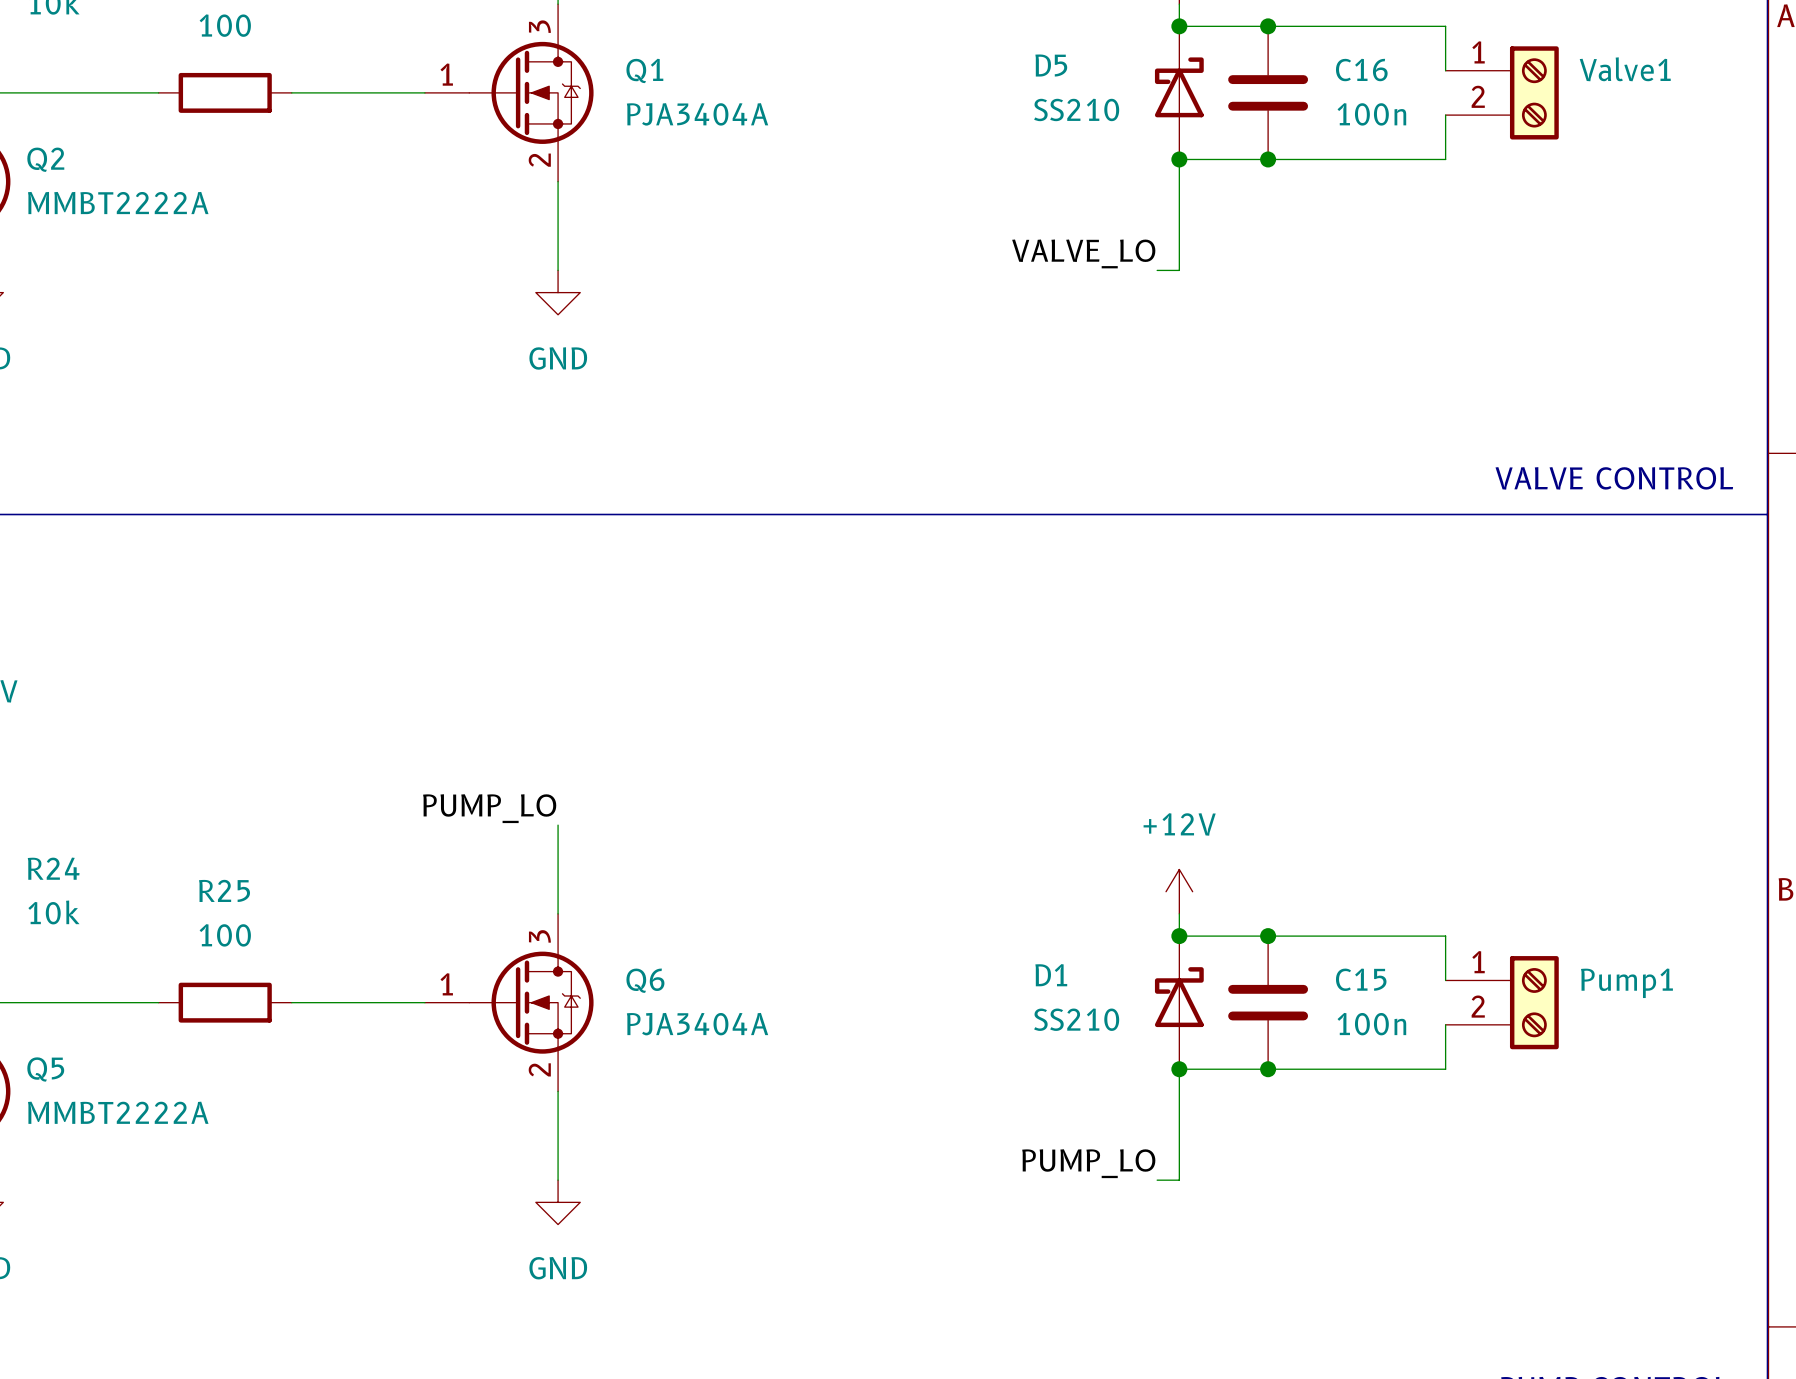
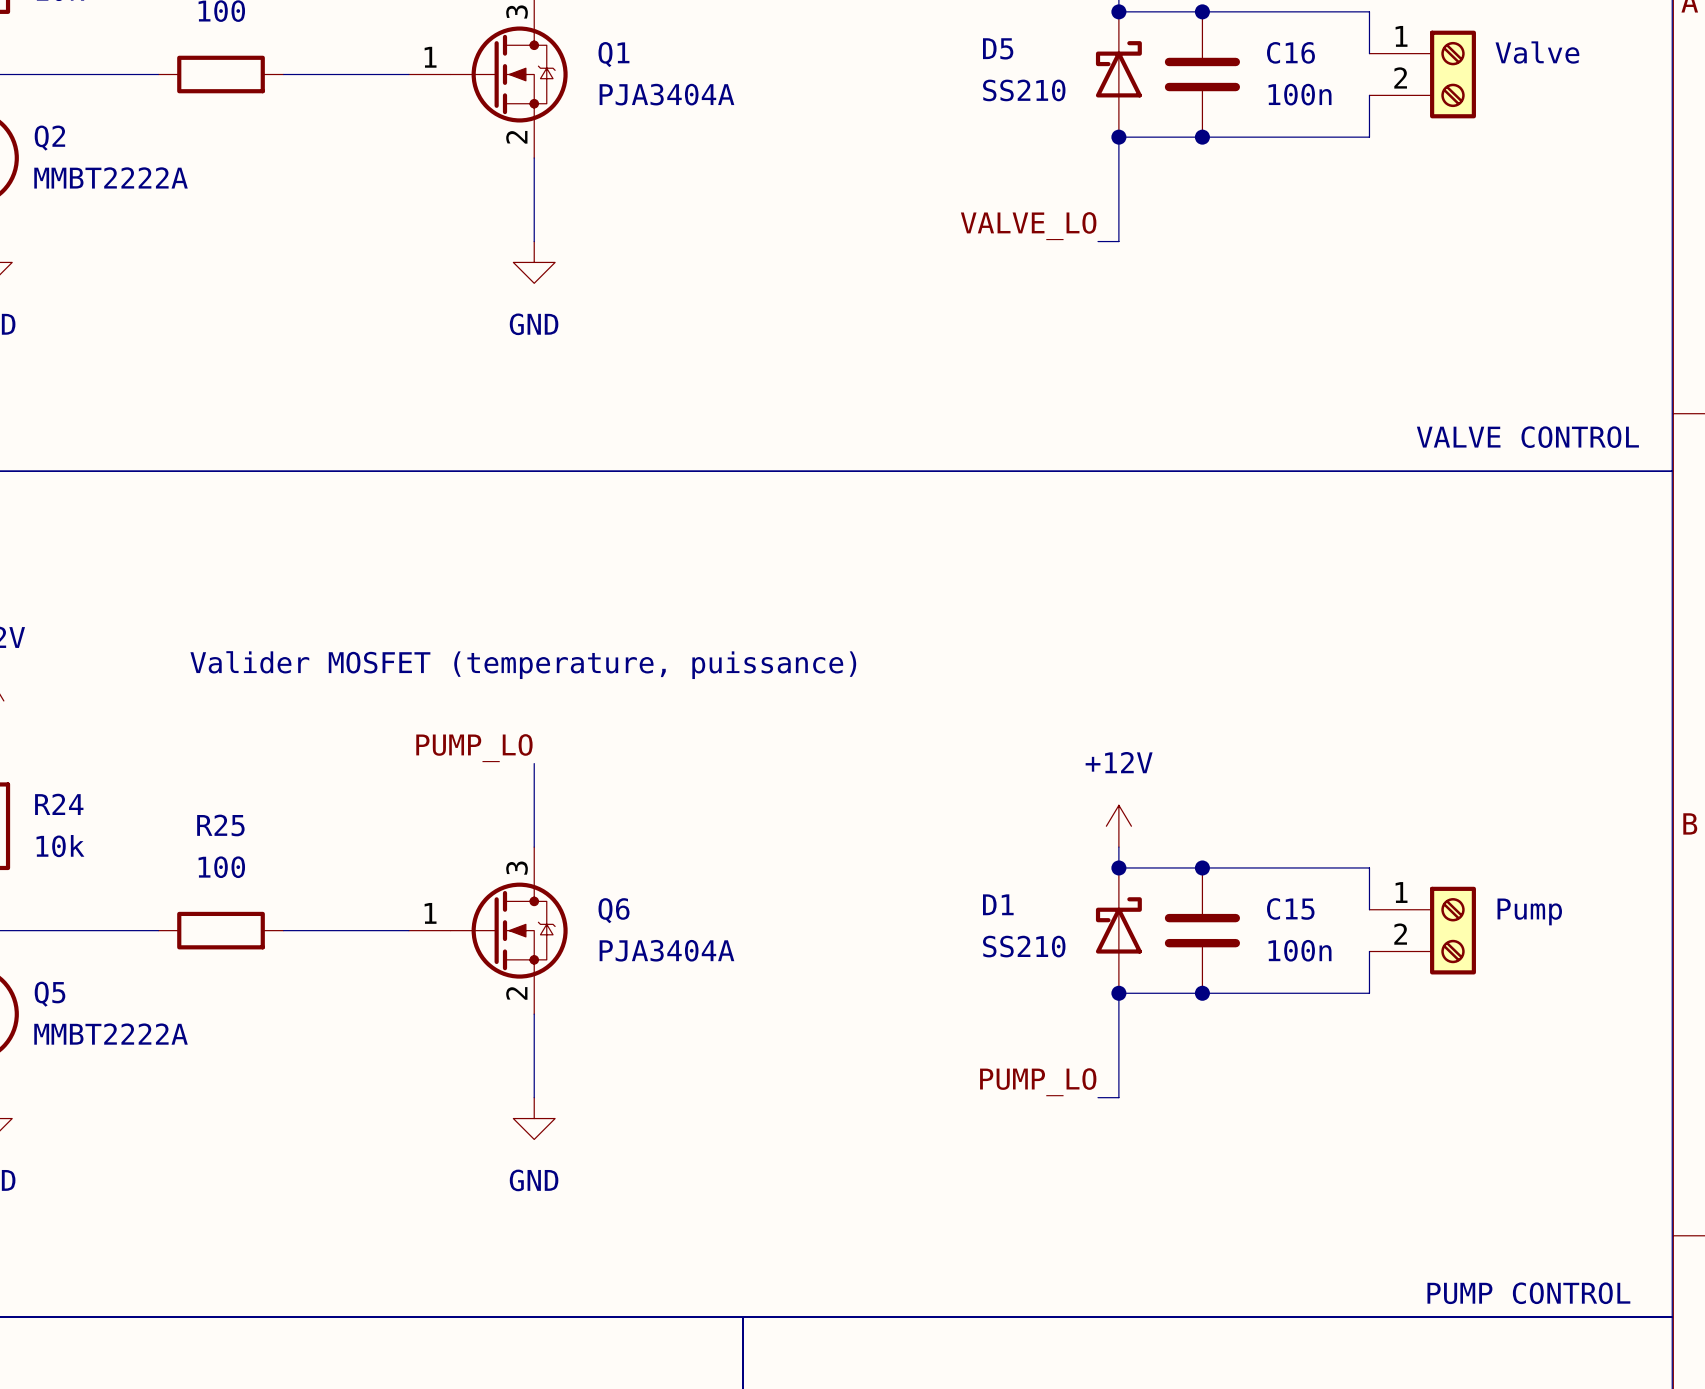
Valve1 name: Valve1 (1625, 69) -> Valve (1537, 52)
text: none -> Valider MOSFET (temperature, puissance) (523, 665)
Pump1 name: Pump1 (1626, 983) -> Pump (1529, 911)

